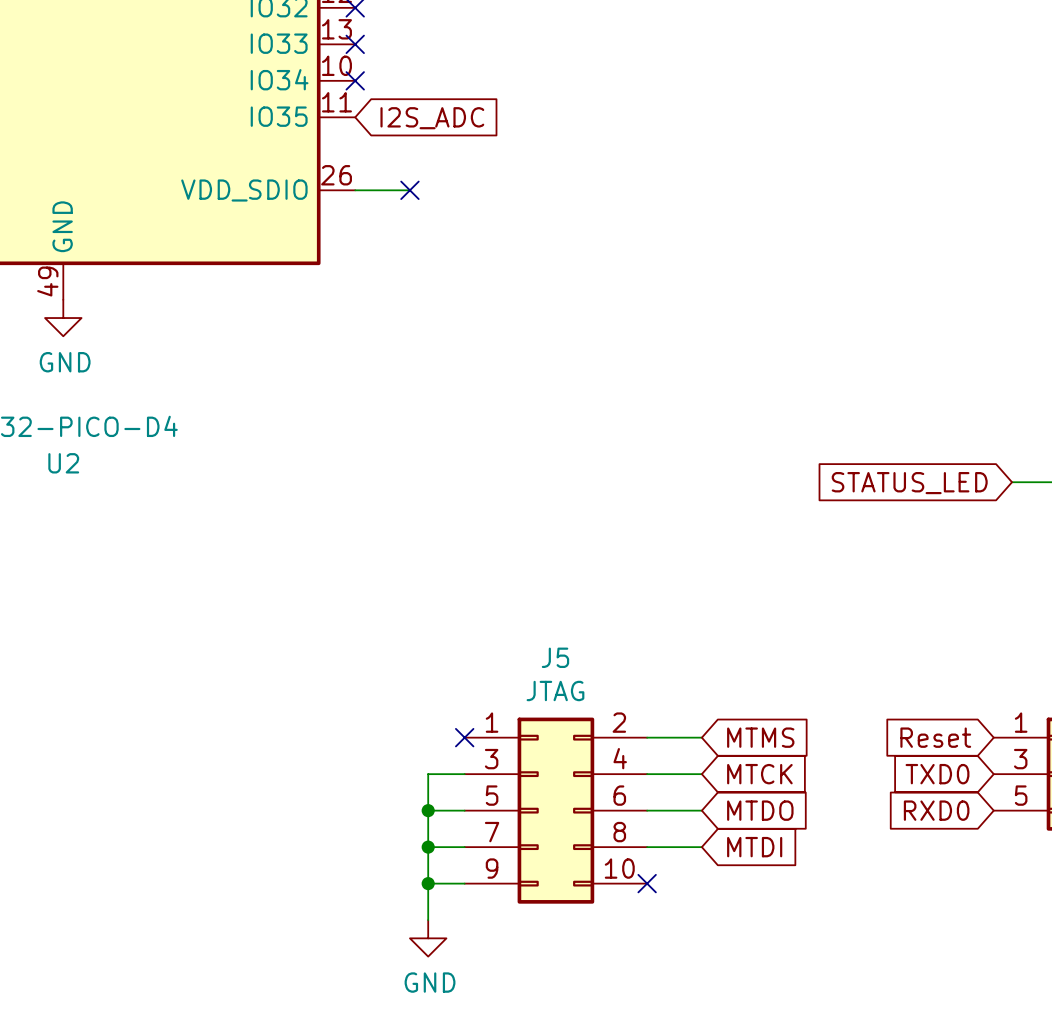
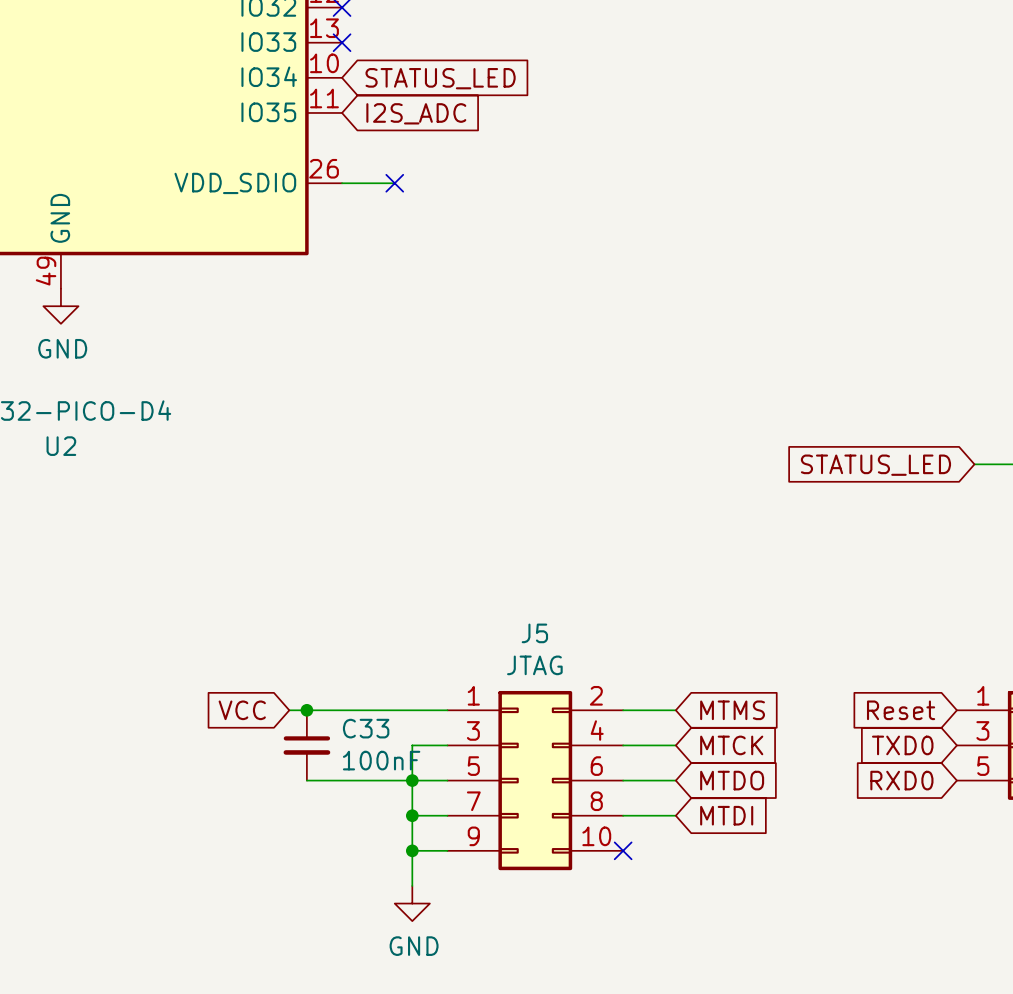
no-connect mark: (355, 80) -> none
global label: none -> STATUS_LED (440, 78)
global label: none -> VCC (242, 710)
wire: none -> (289, 710) (447, 710)
junction: none -> (306, 710)
no-connect mark: (464, 737) -> none
C33: none -> 100nF (306, 745)
wire: none -> (306, 780) (412, 780)

